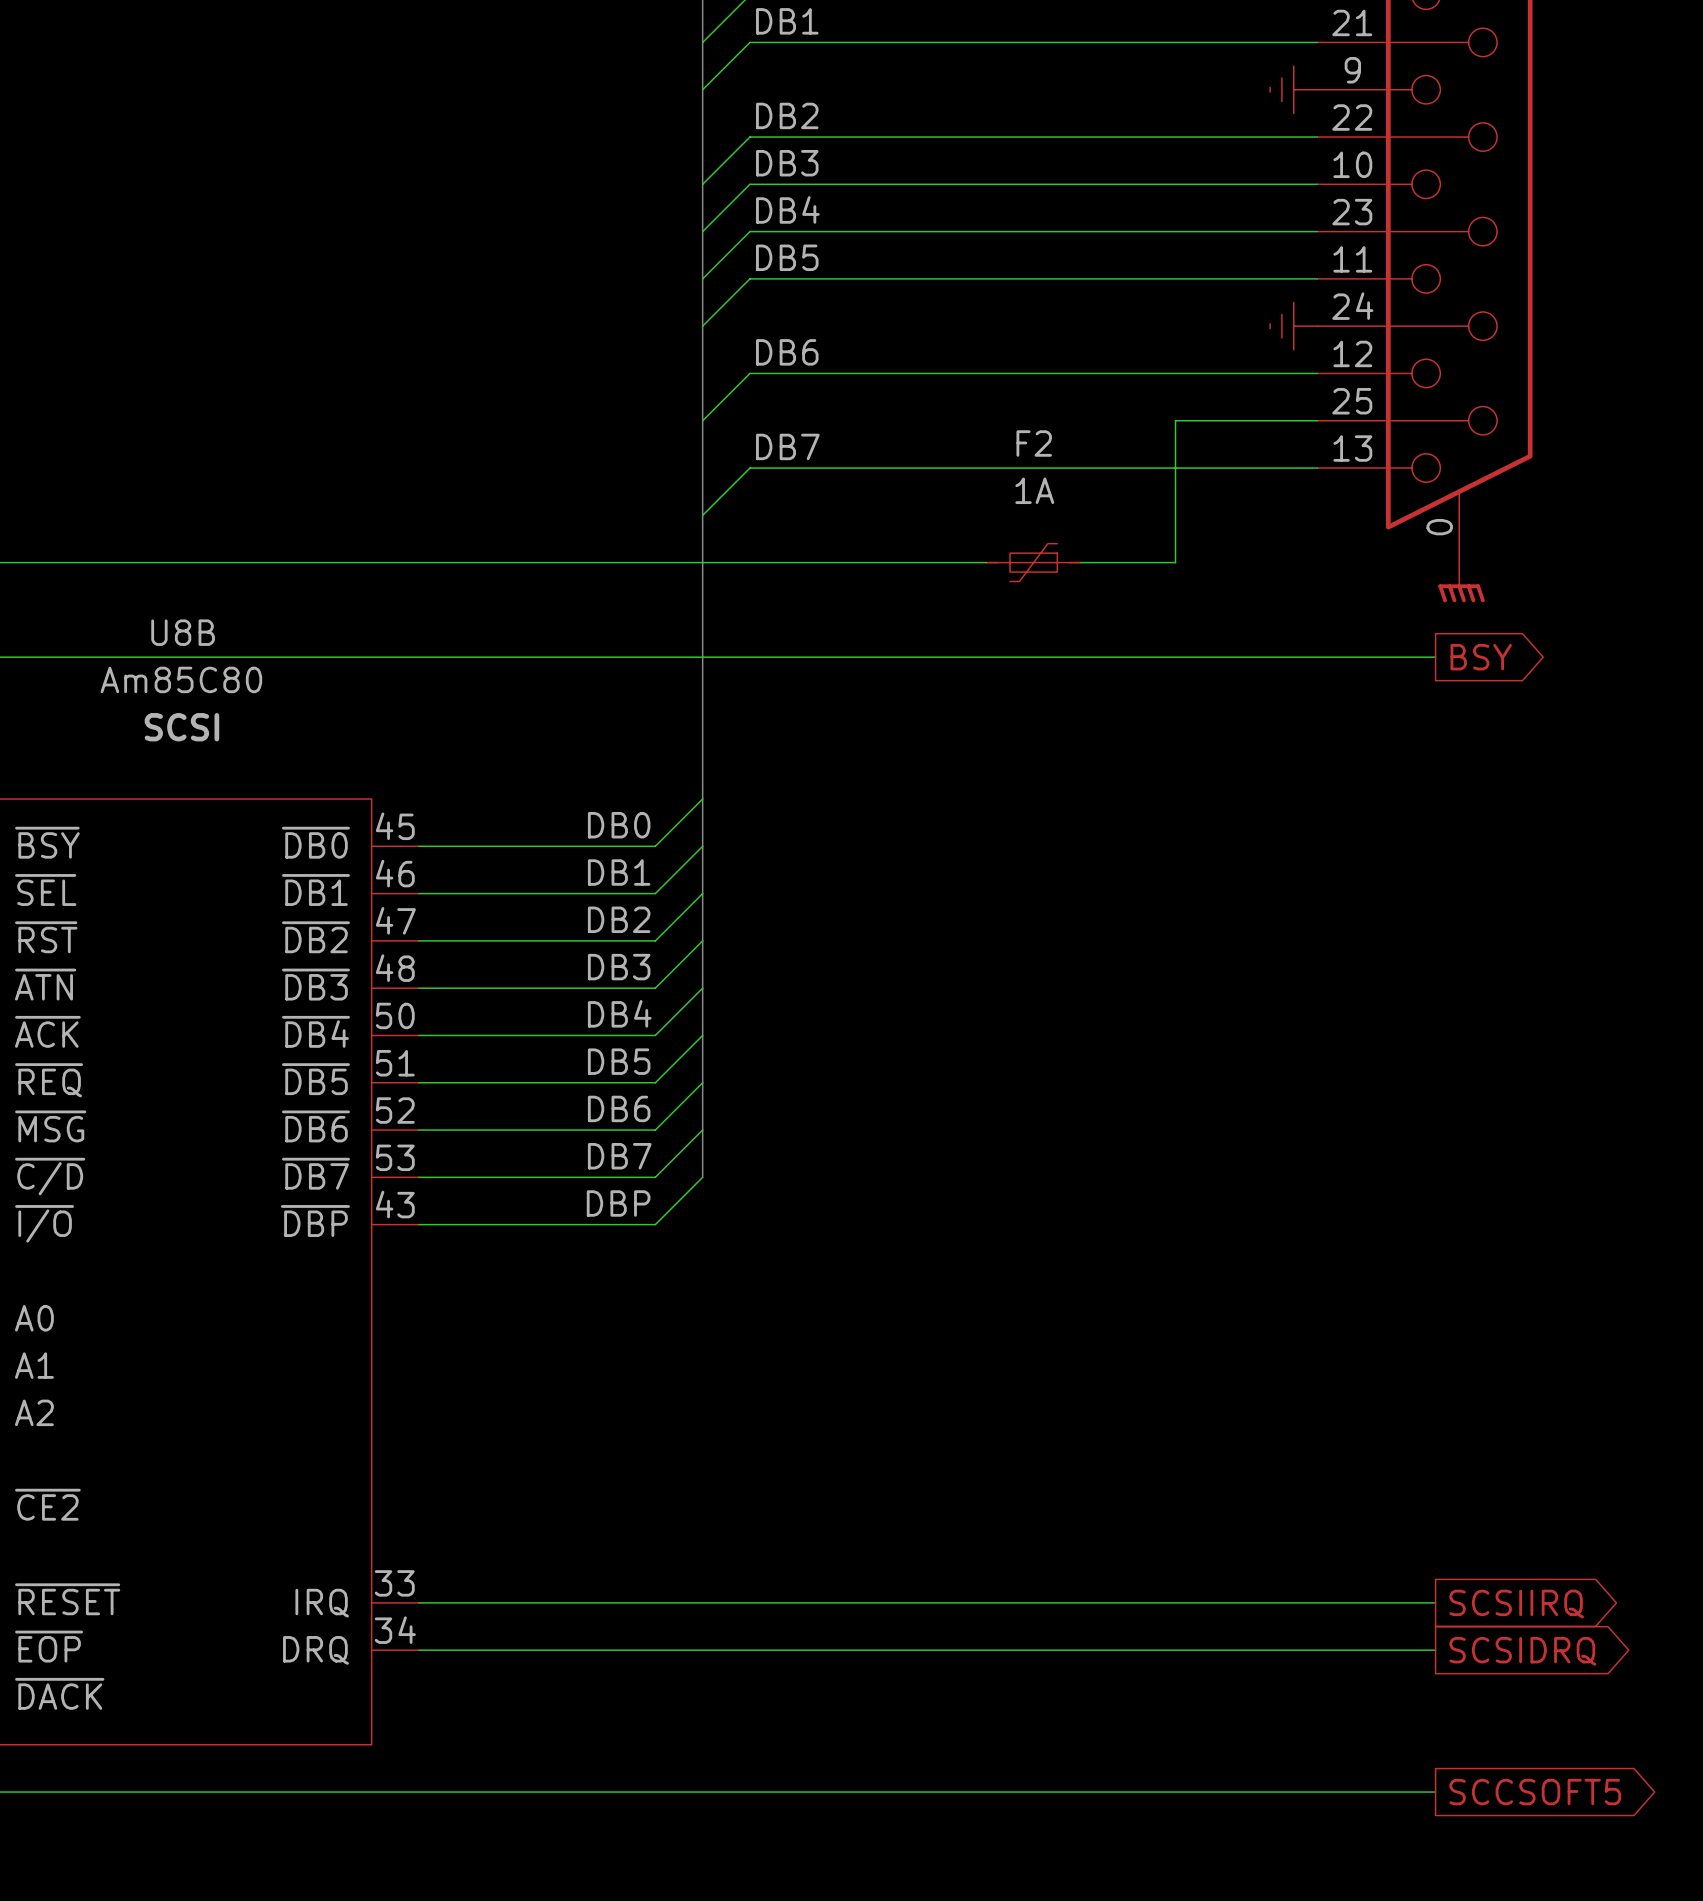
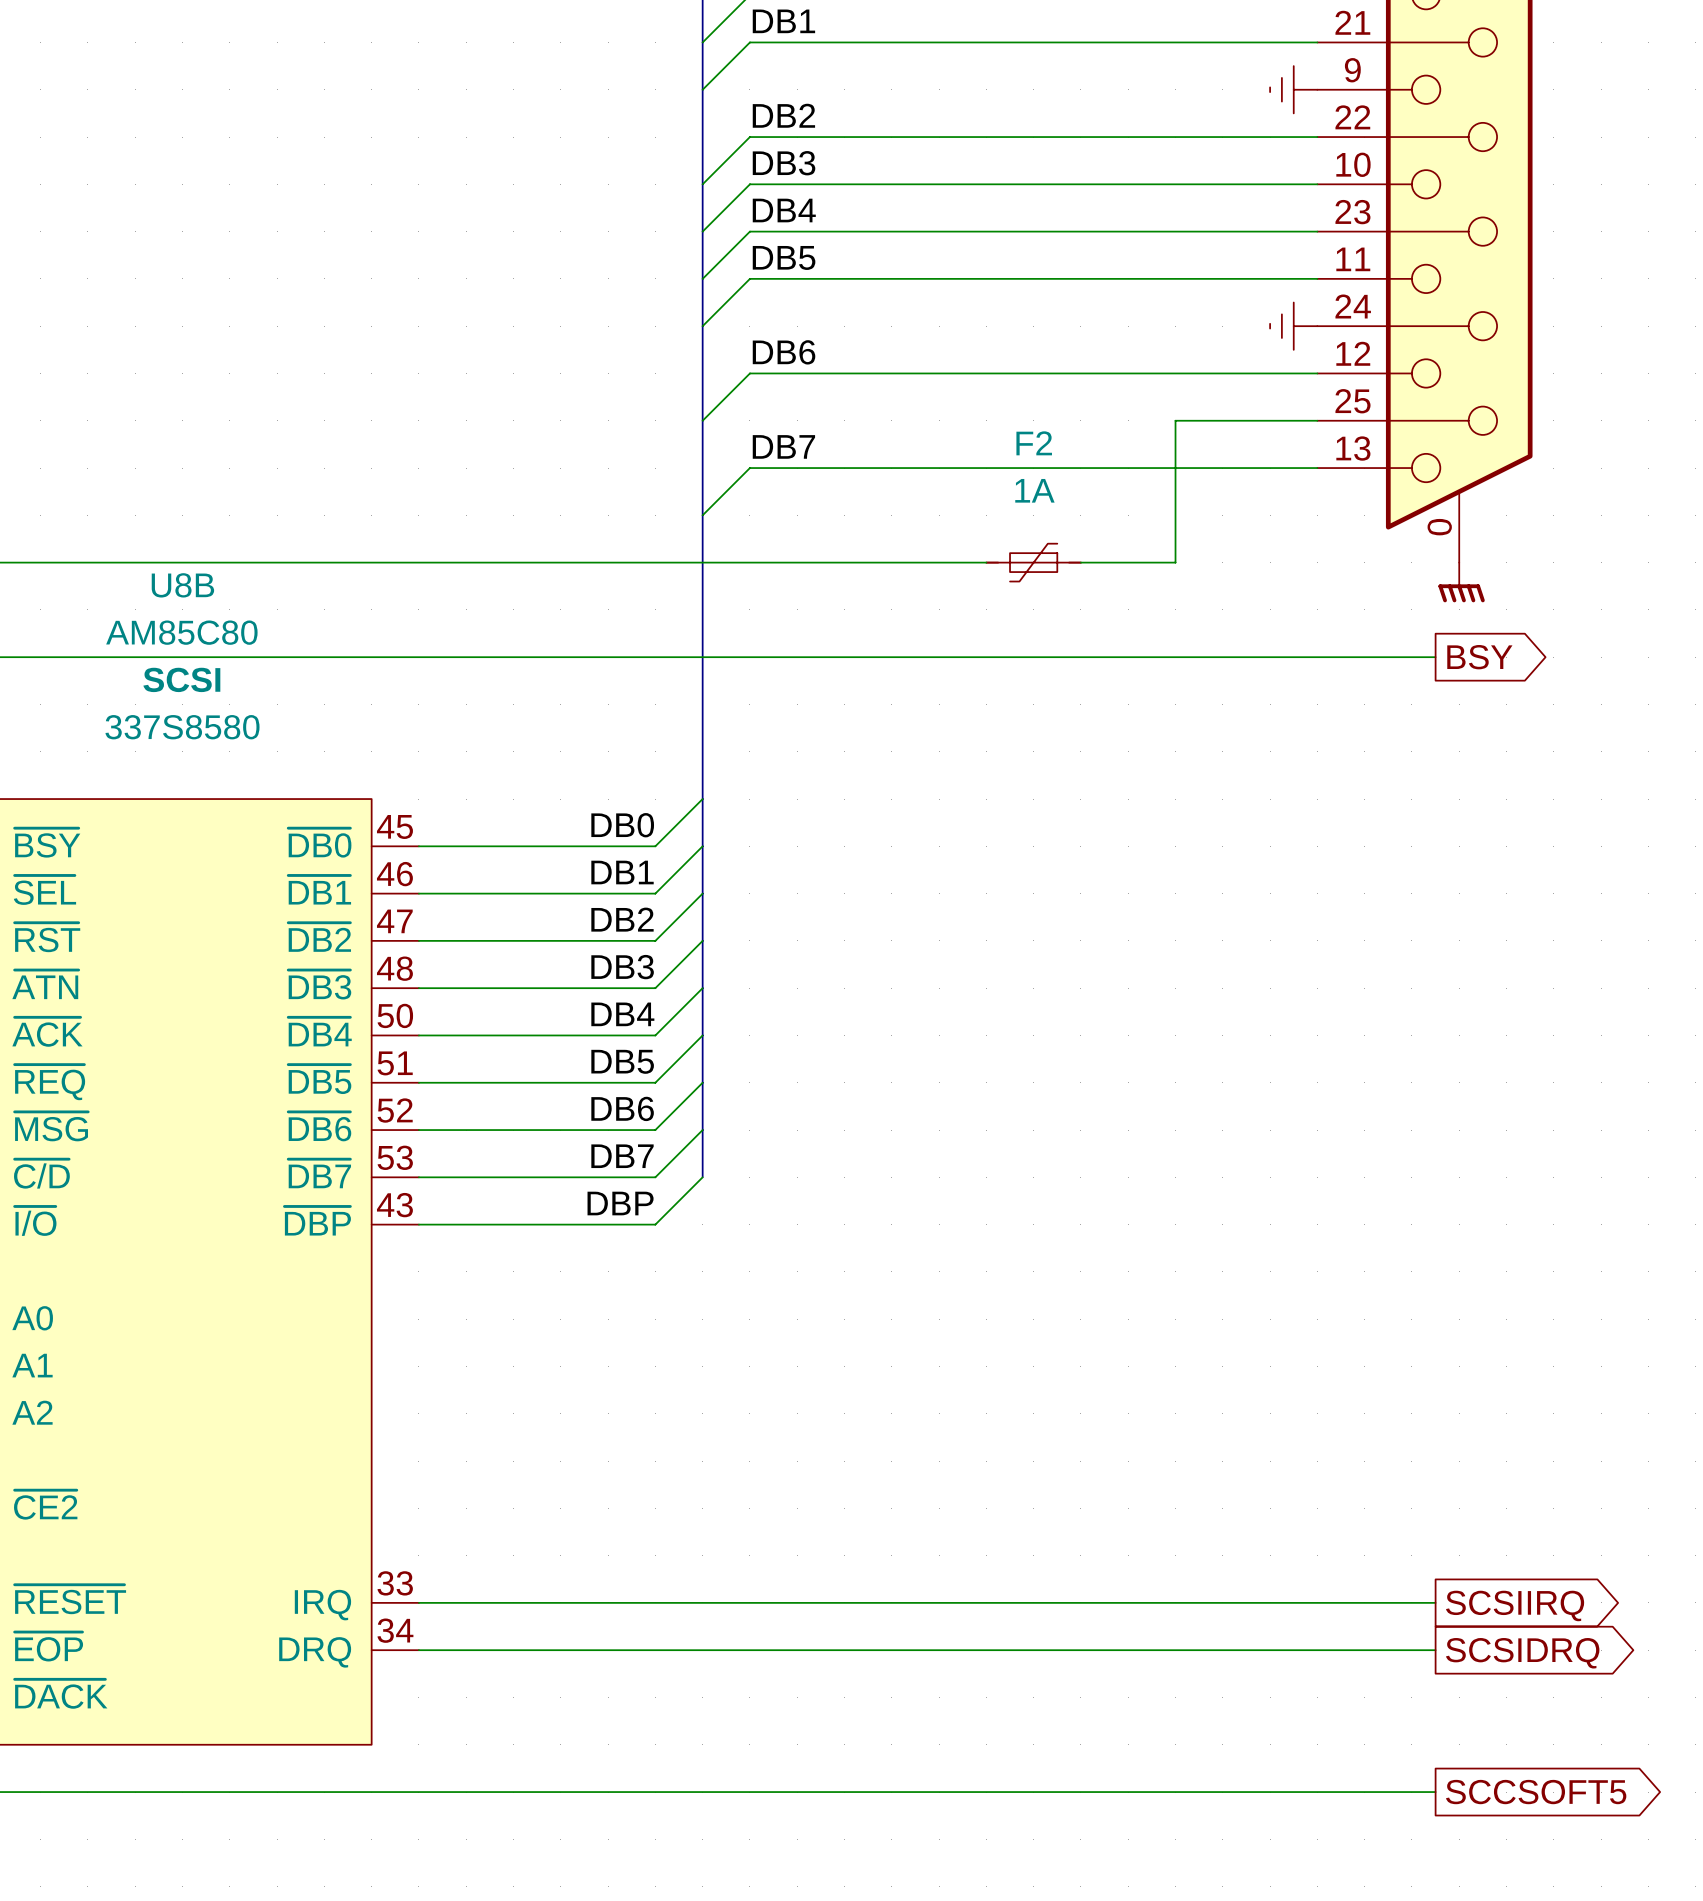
U8B name position: U8B (183, 632) -> U8B (182, 585)
U8B value: Am85C80 (181, 679) -> AM85C80 (181, 632)
U8B text position: SCSI (181, 727) -> SCSI (181, 679)
U8B text: none -> 337S8580 (182, 727)

